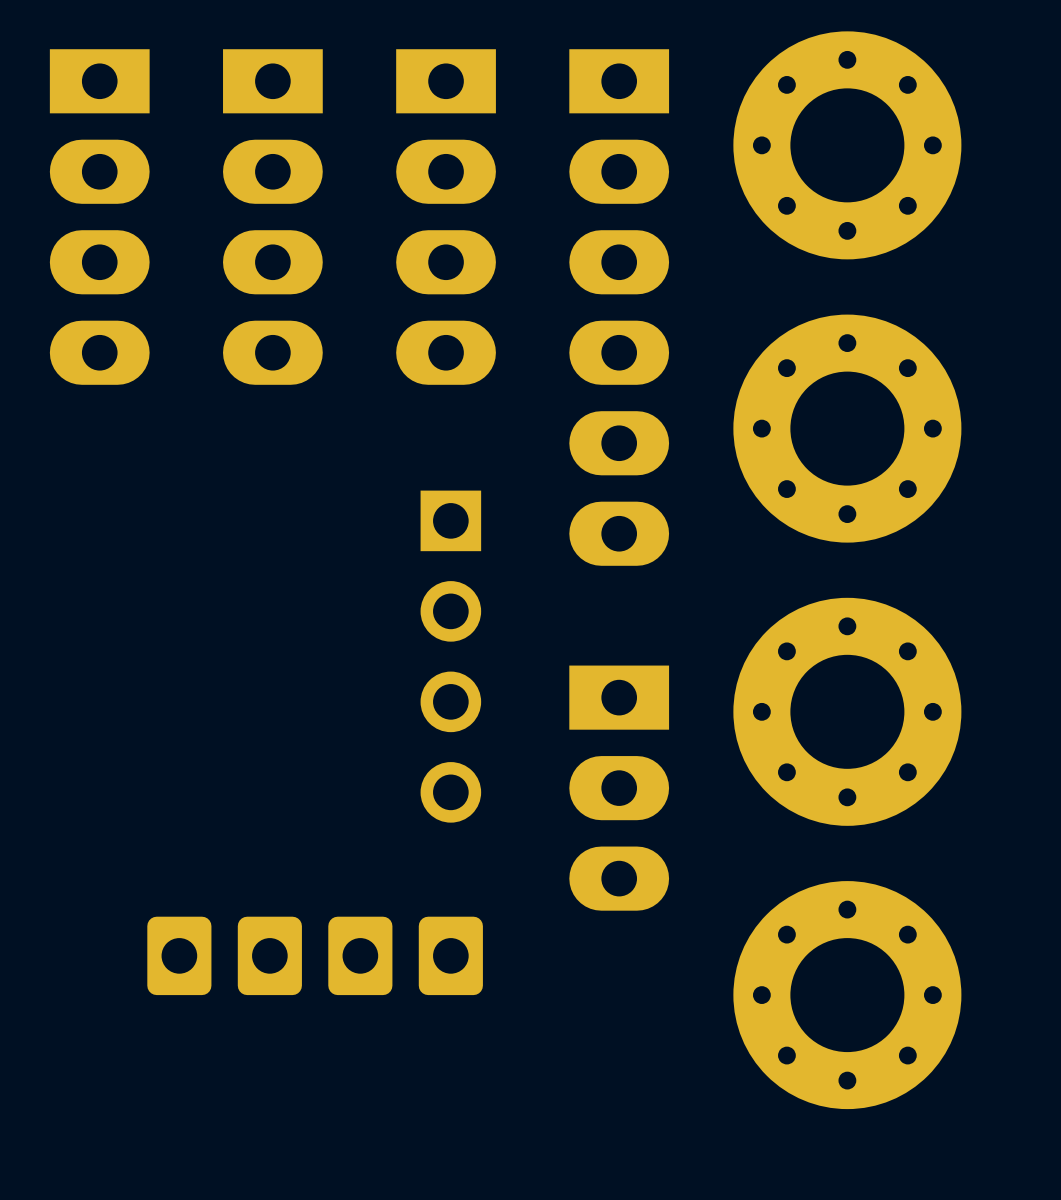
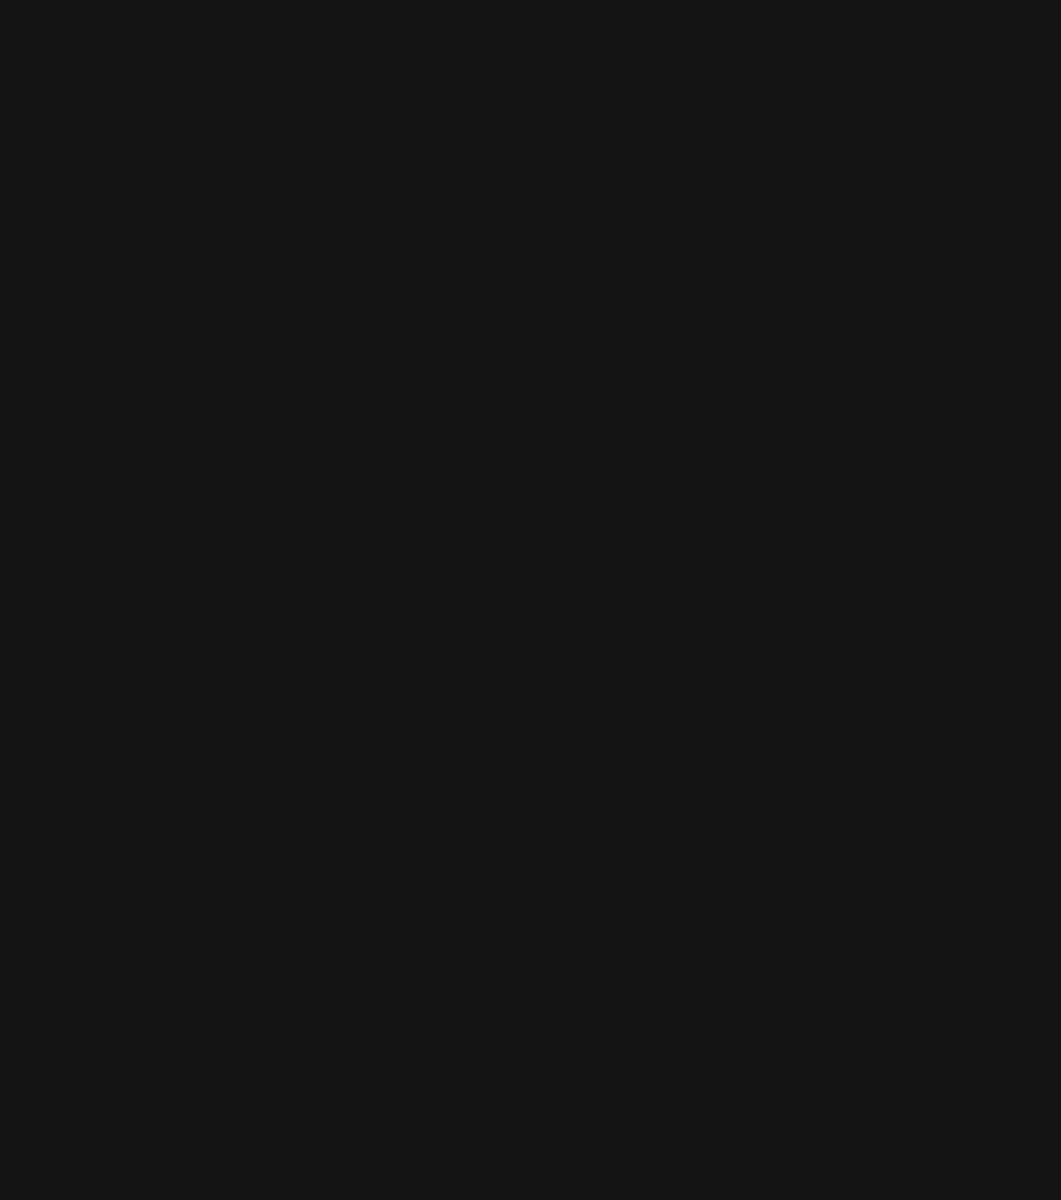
part: (847, 145) -> none
part: (99, 217) -> none
part: (272, 217) -> none
part: (446, 217) -> none
part: (619, 307) -> none
part: (847, 428) -> none
part: (450, 656) -> none
part: (847, 711) -> none
part: (619, 788) -> none
part: (315, 955) -> none
part: (847, 995) -> none

